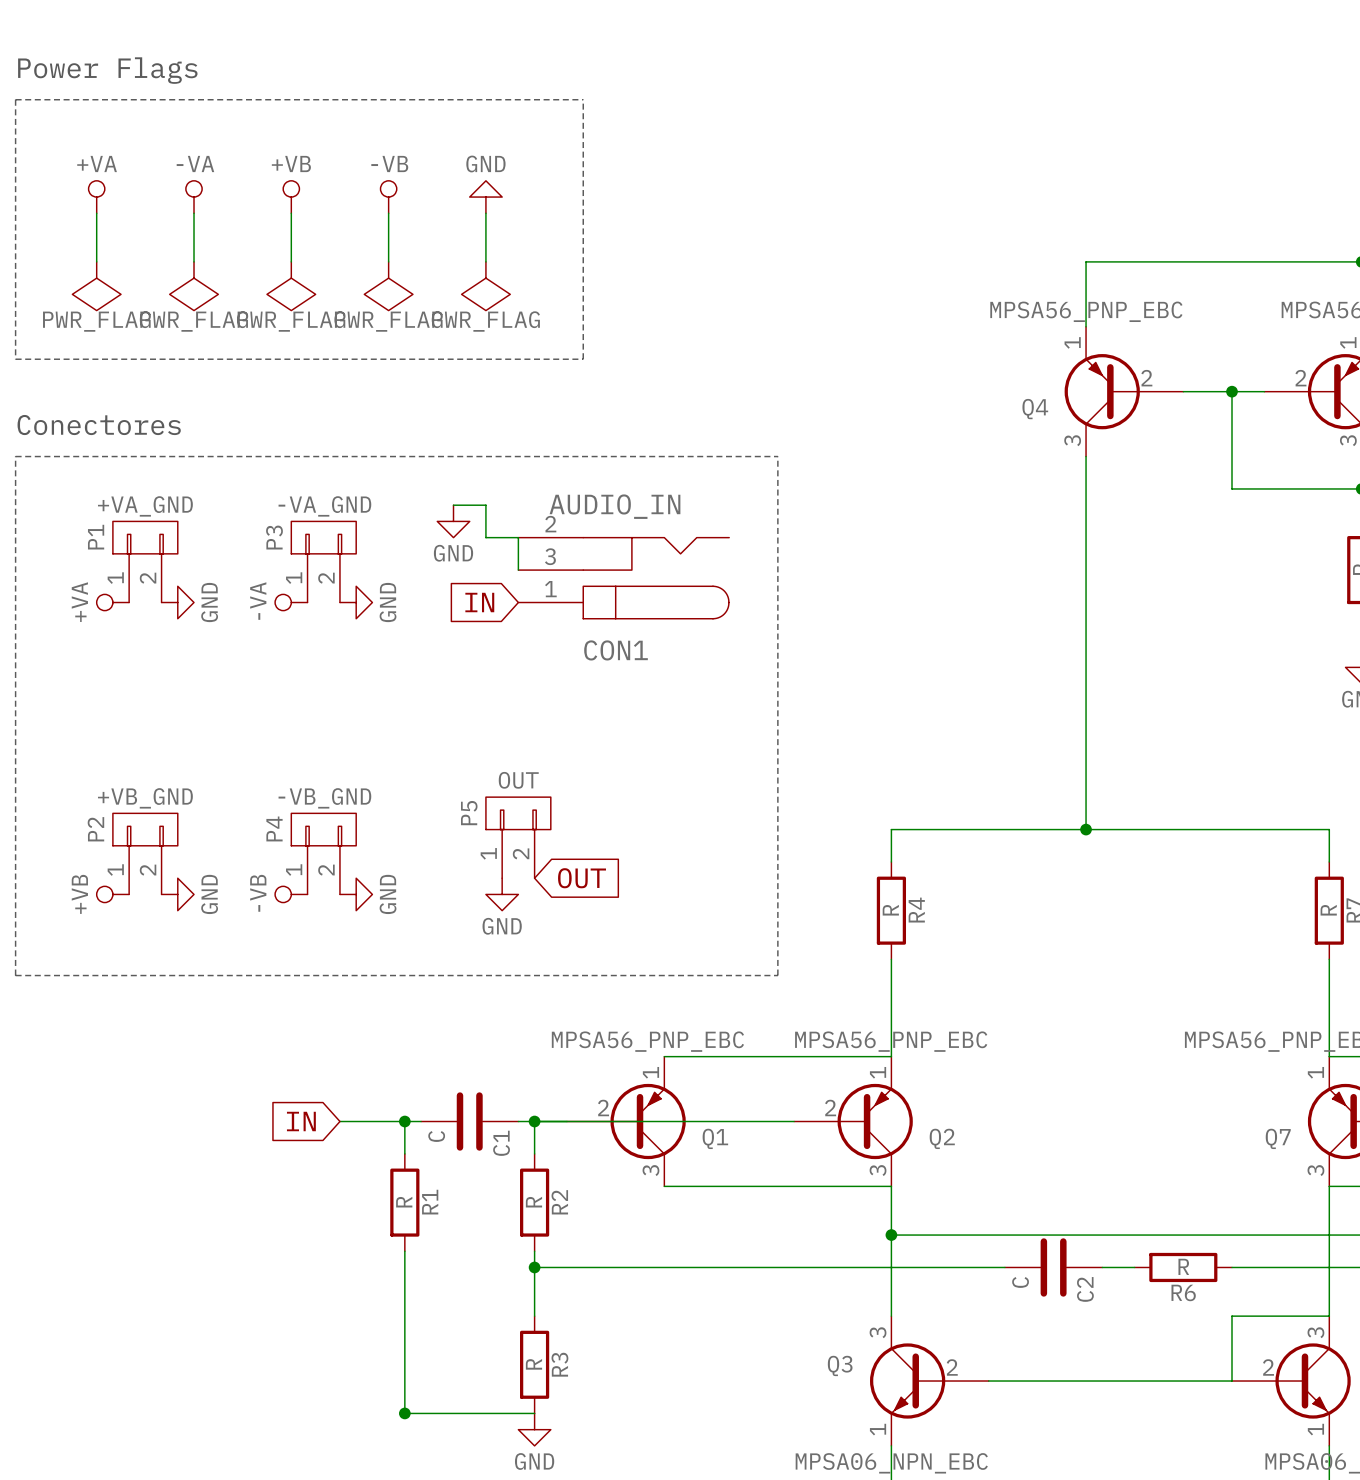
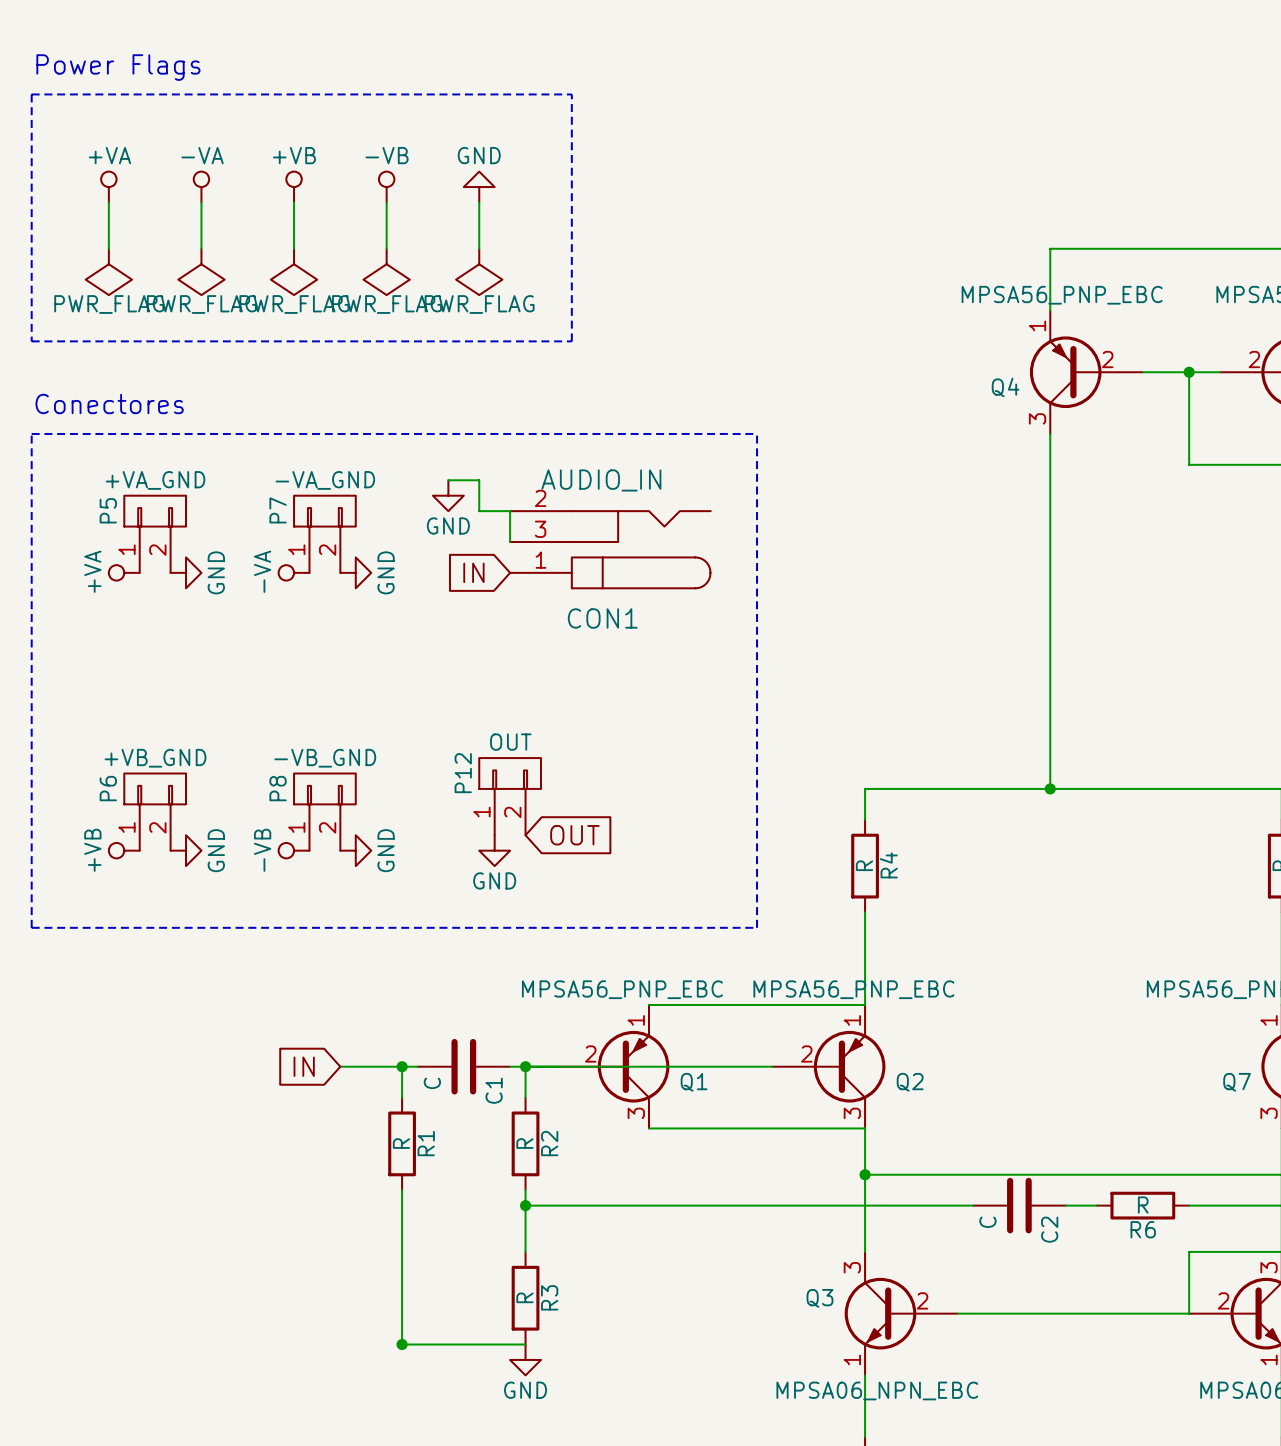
P1 name: P1 (96, 537) -> P5 (108, 510)
P3 name: P3 (274, 537) -> P7 (278, 510)
P5 name: P5 (469, 813) -> P12 (463, 773)
P4 name: P4 (274, 828) -> P8 (278, 788)
P2 name: P2 (95, 829) -> P6 (108, 788)

